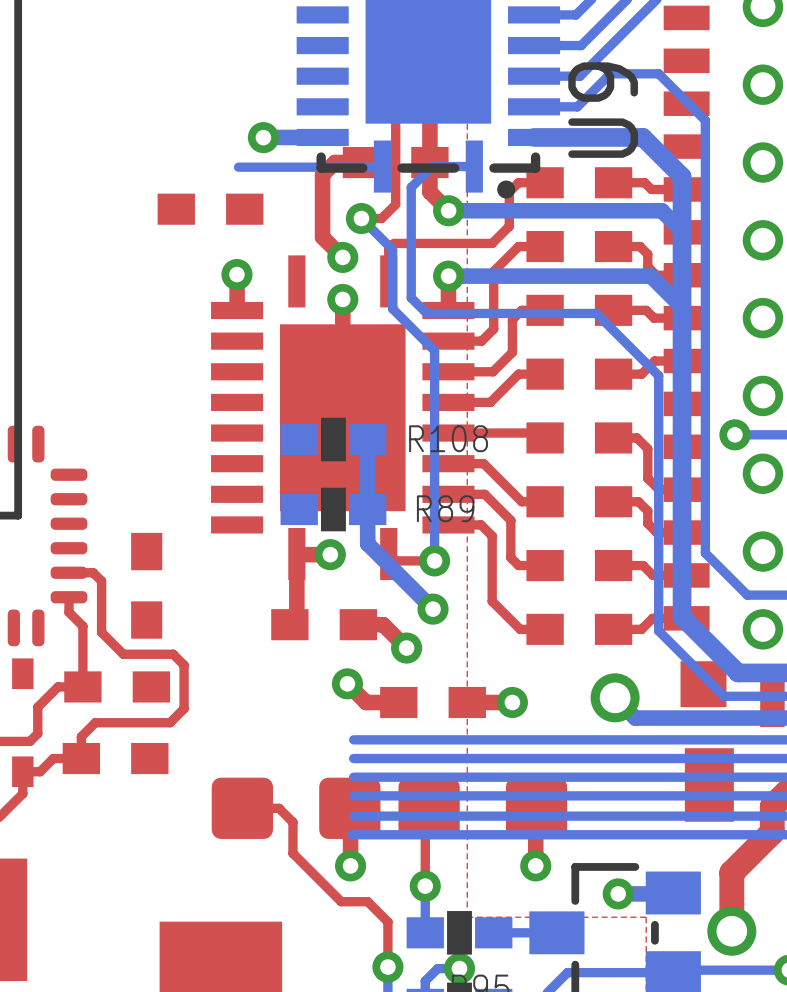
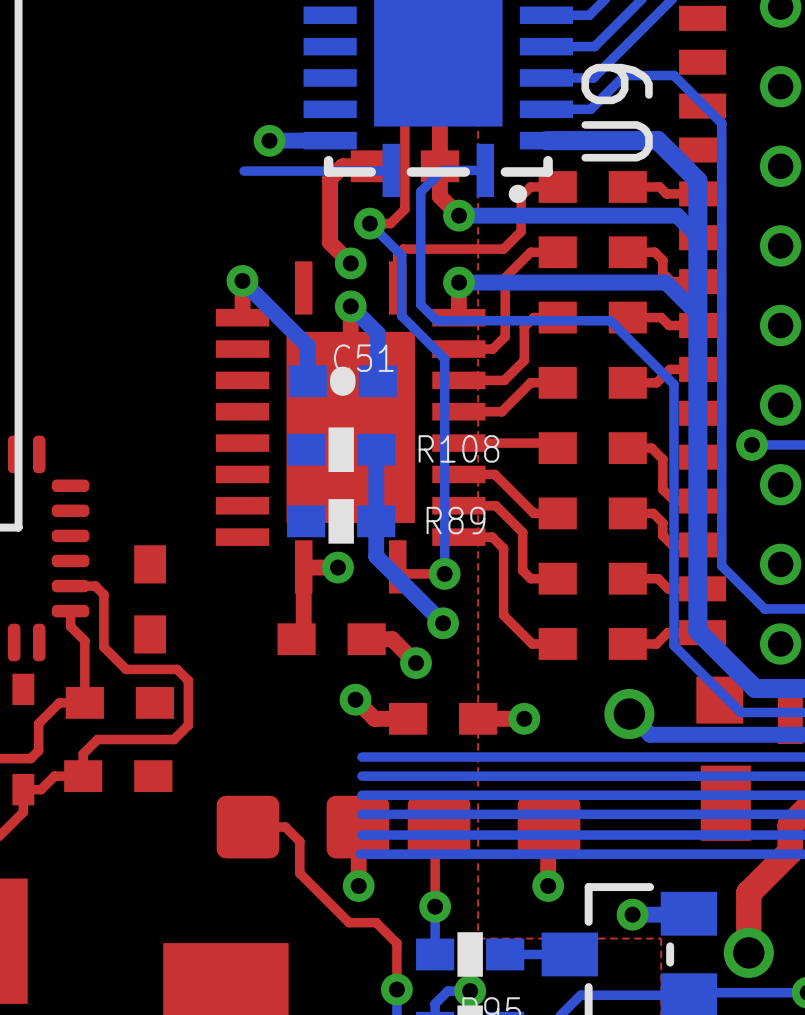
C51 side: top (210, 209) -> bottom (342, 381)
bottom track: none -> (242, 280) (307, 346) (307, 381)
bottom track: none -> (350, 306) (377, 333) (377, 381)

